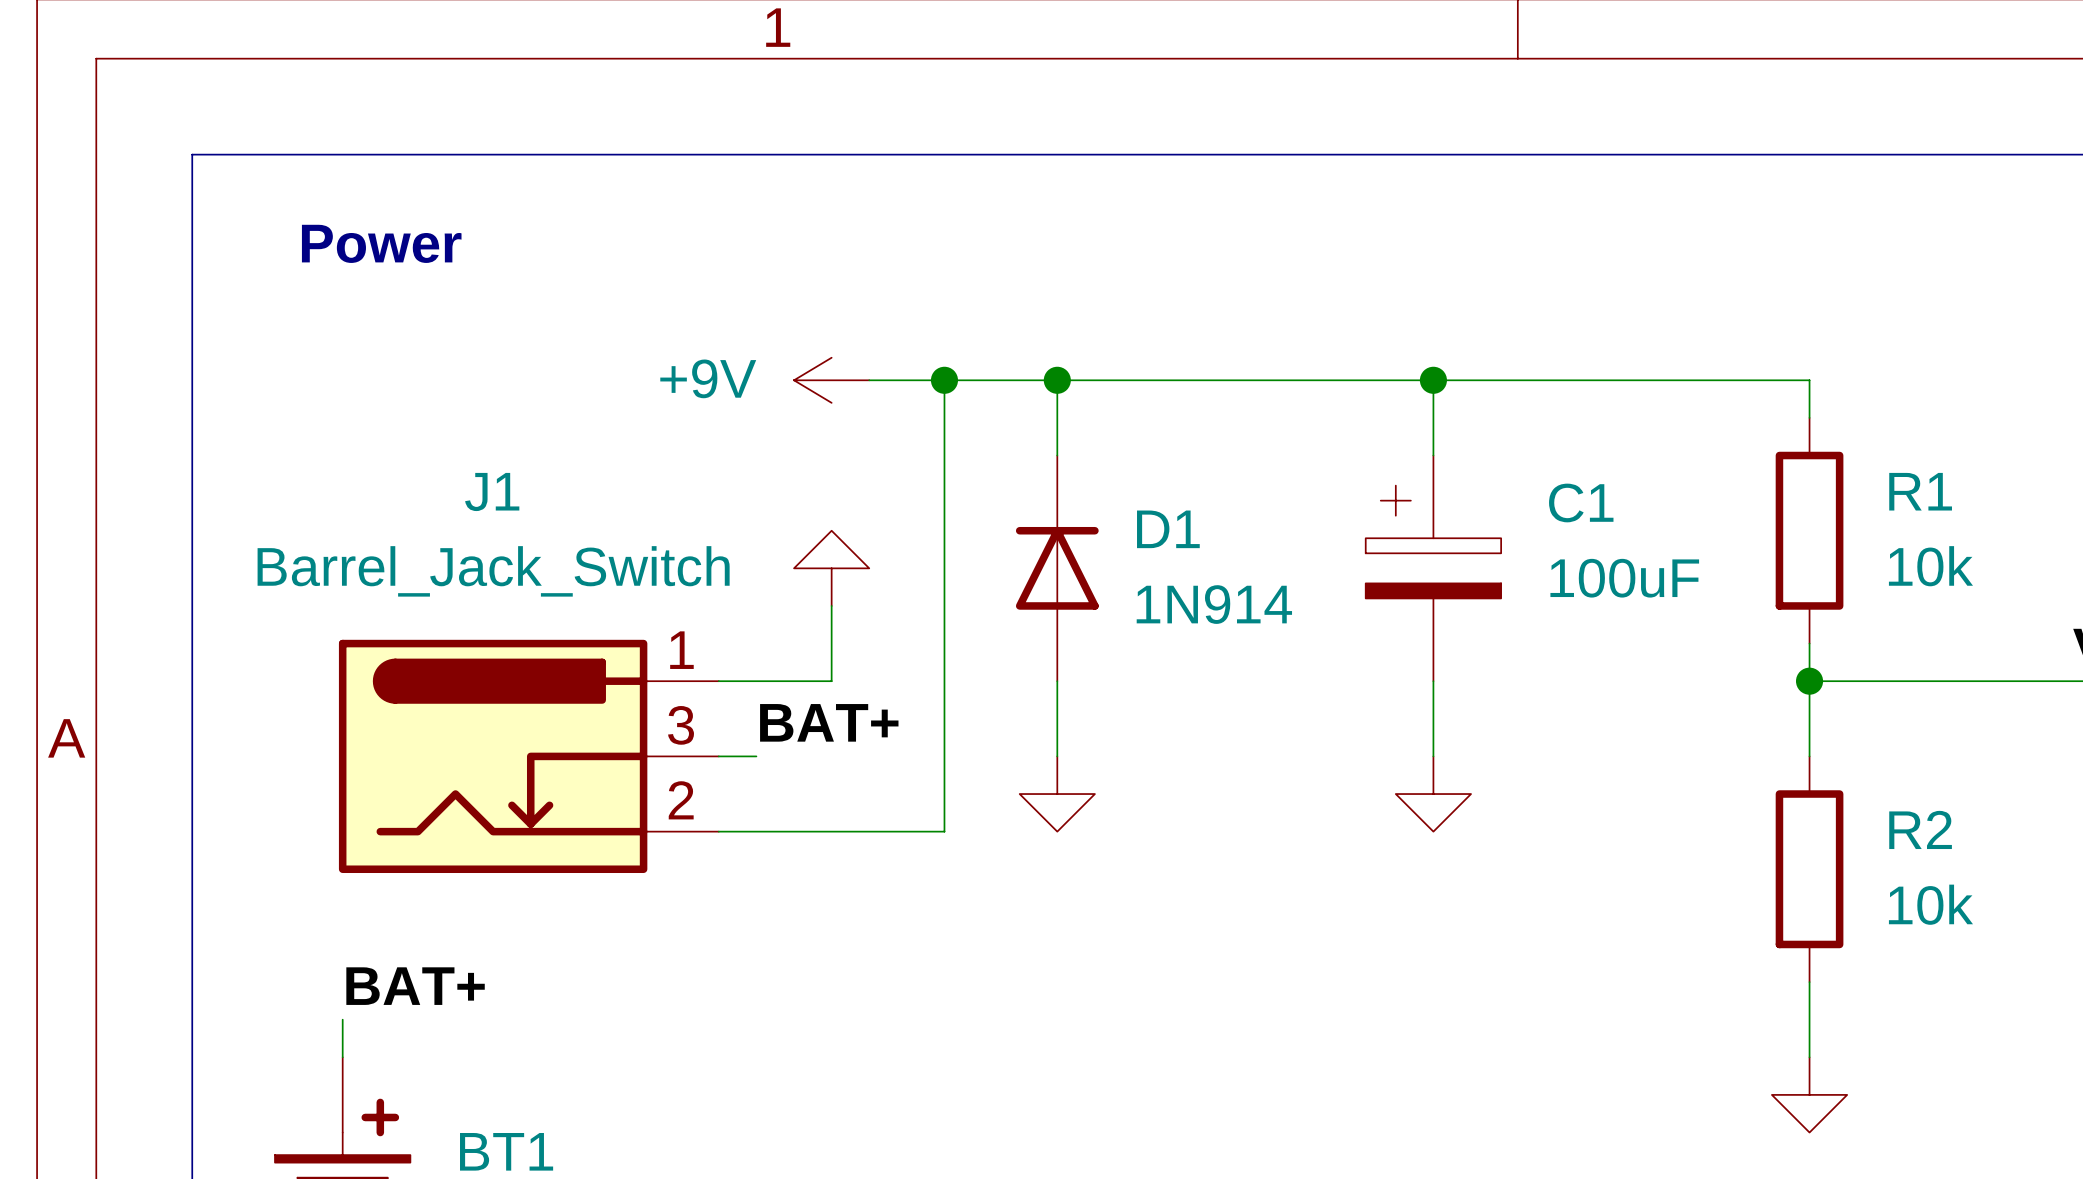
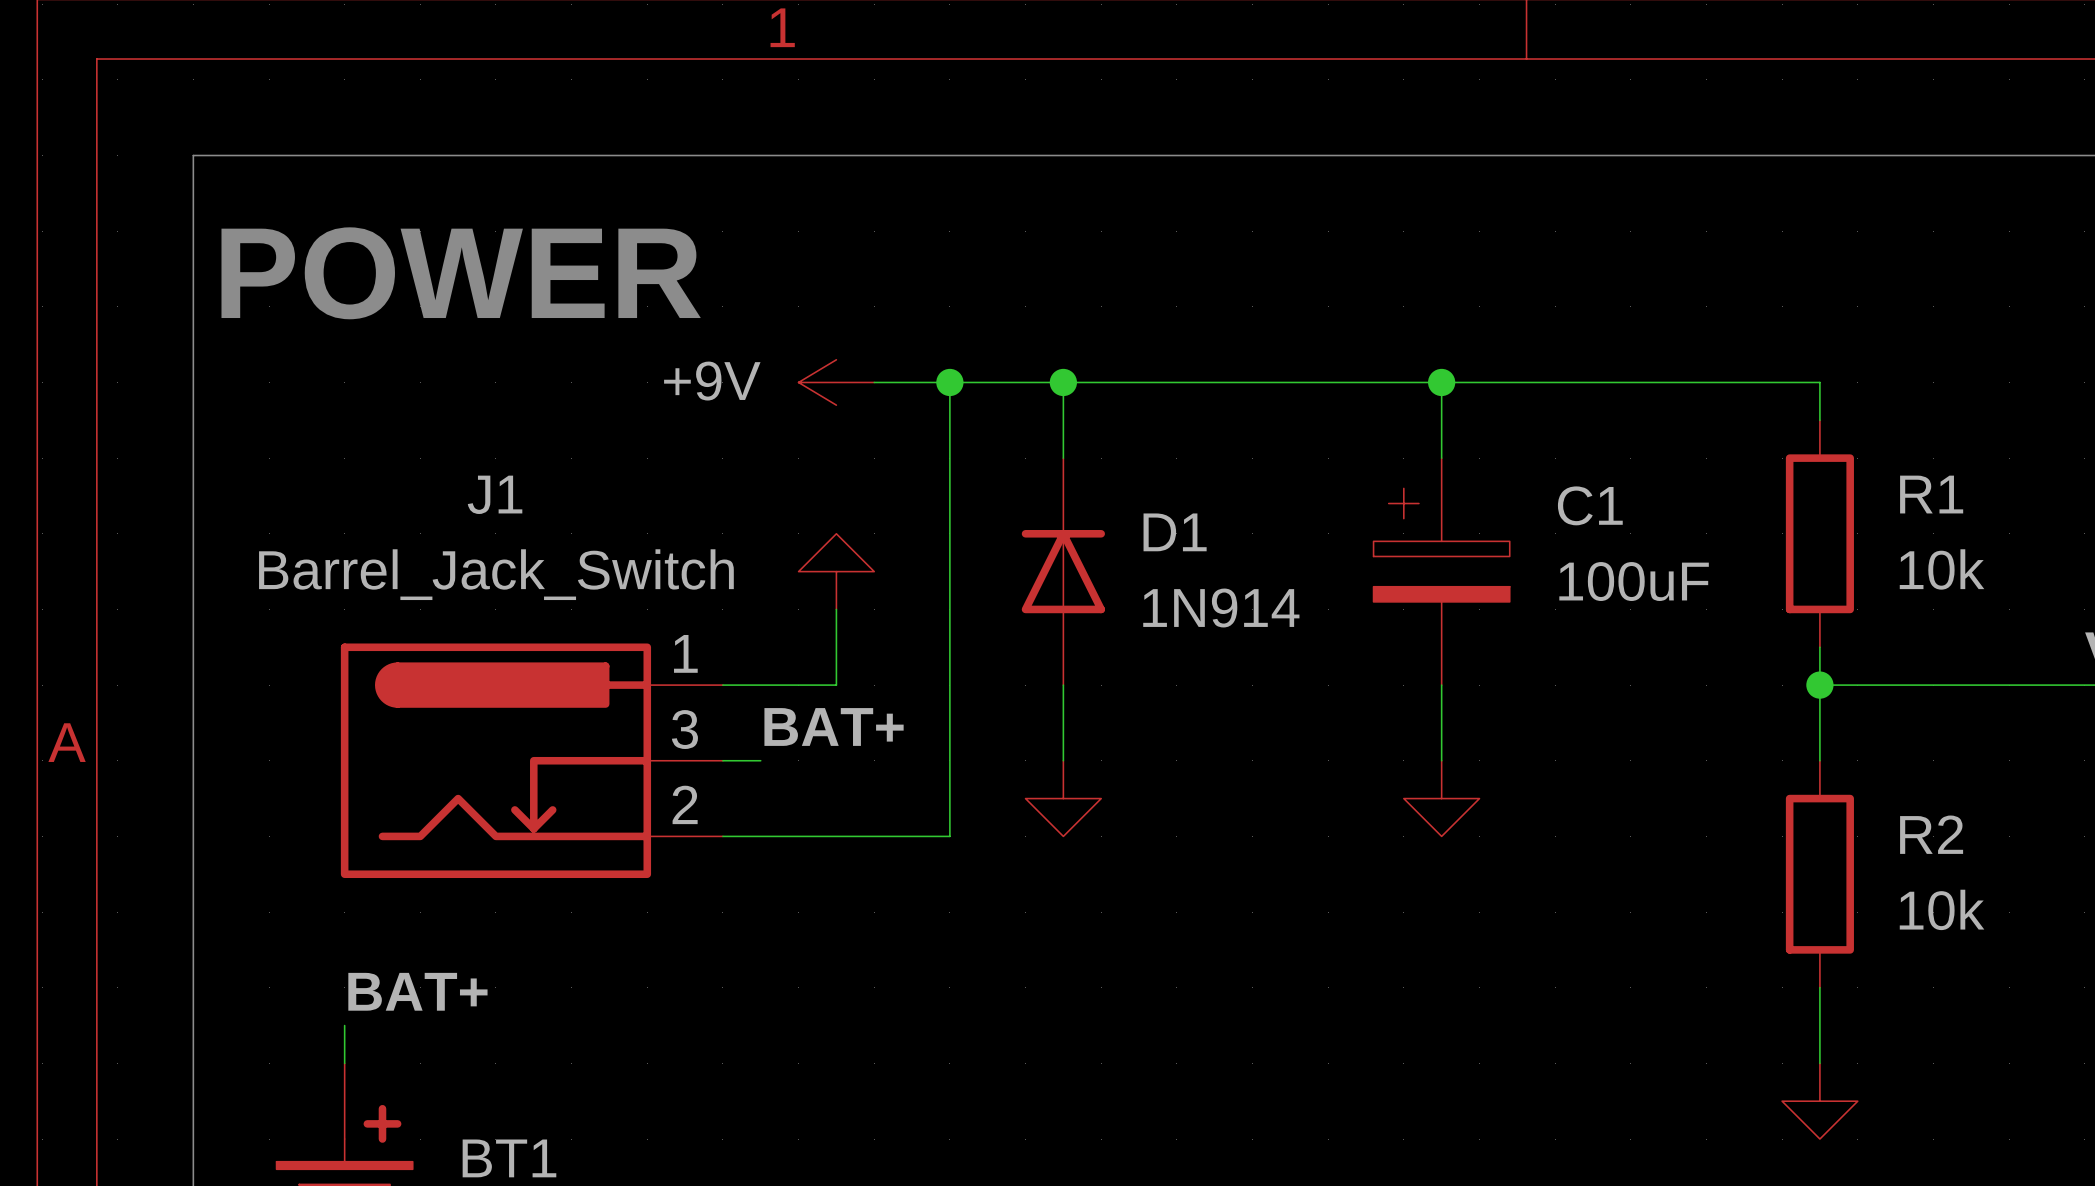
text: Power (381, 243) -> none
text: none -> POWER (461, 273)

